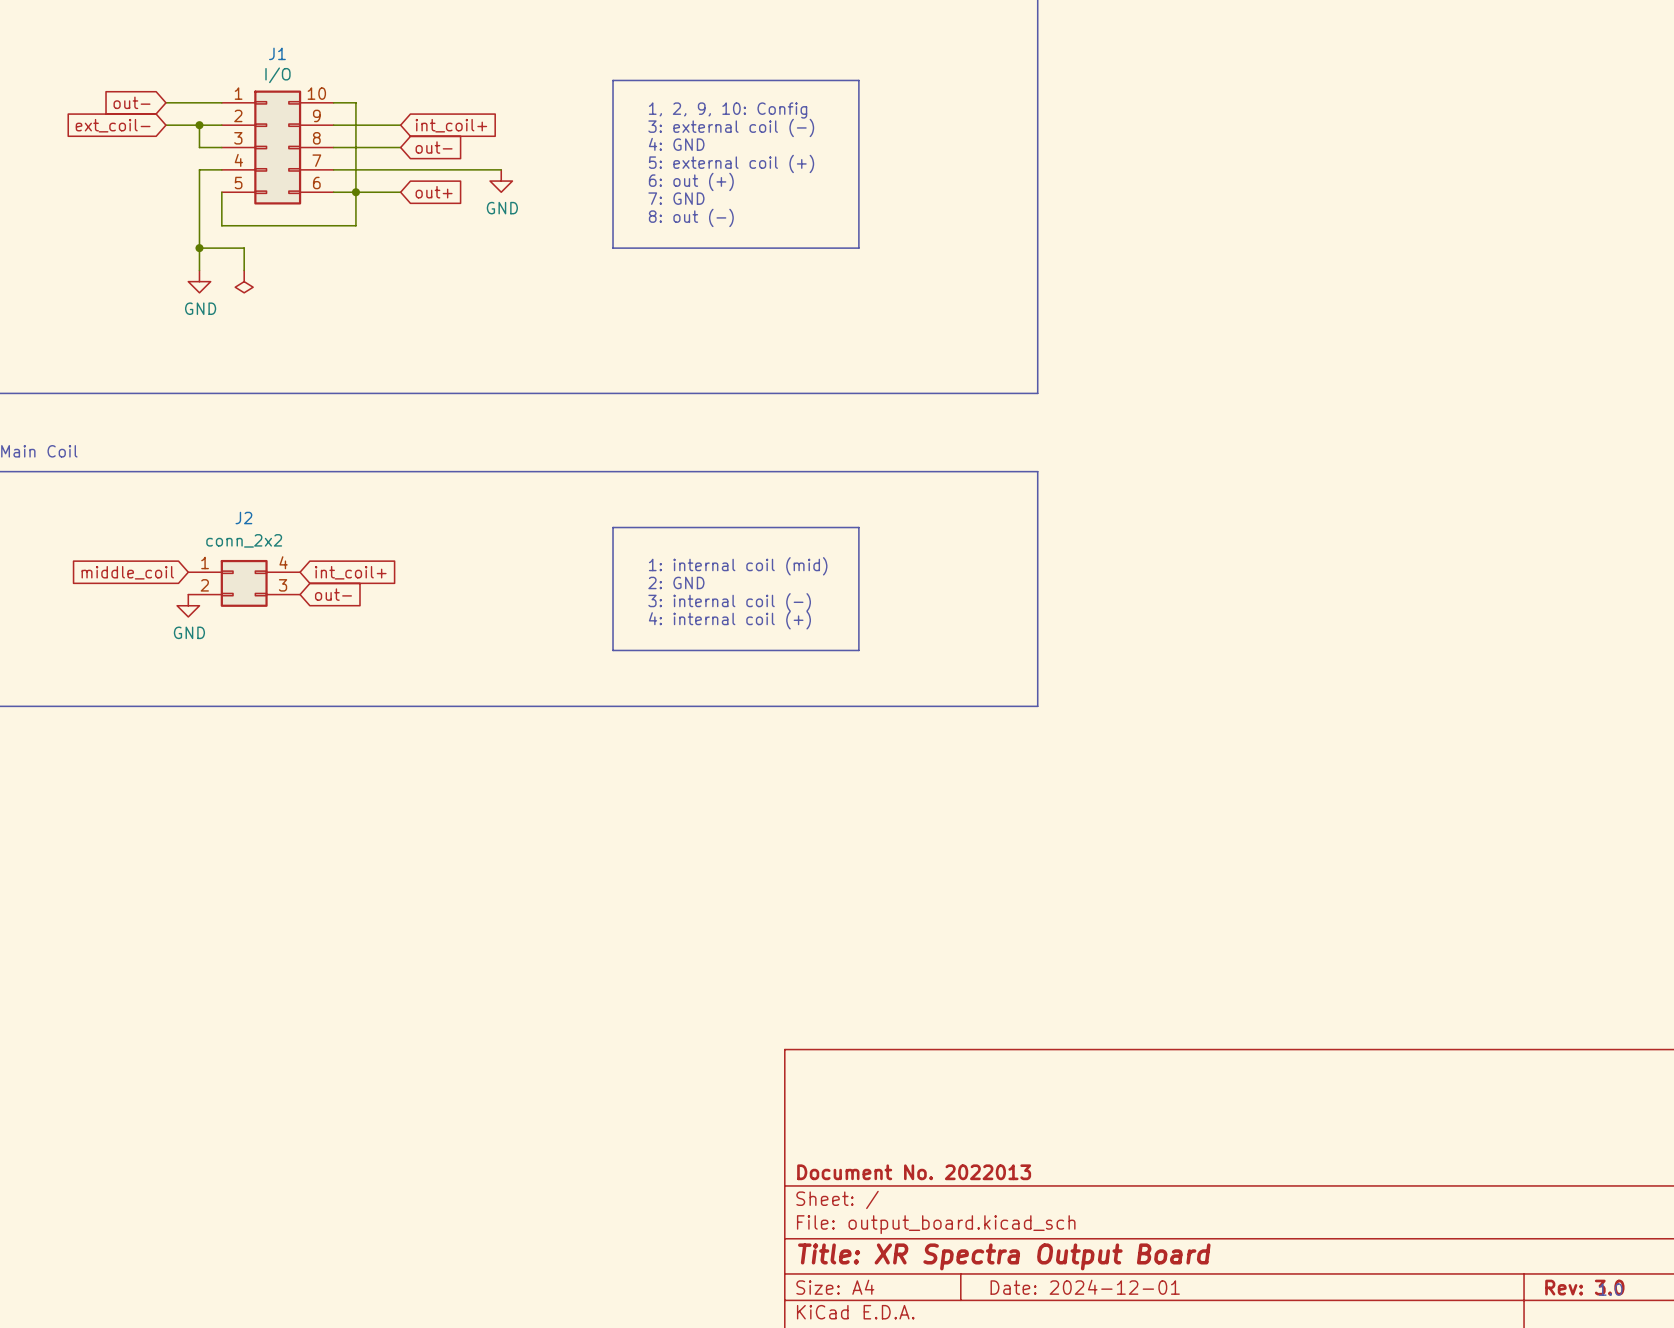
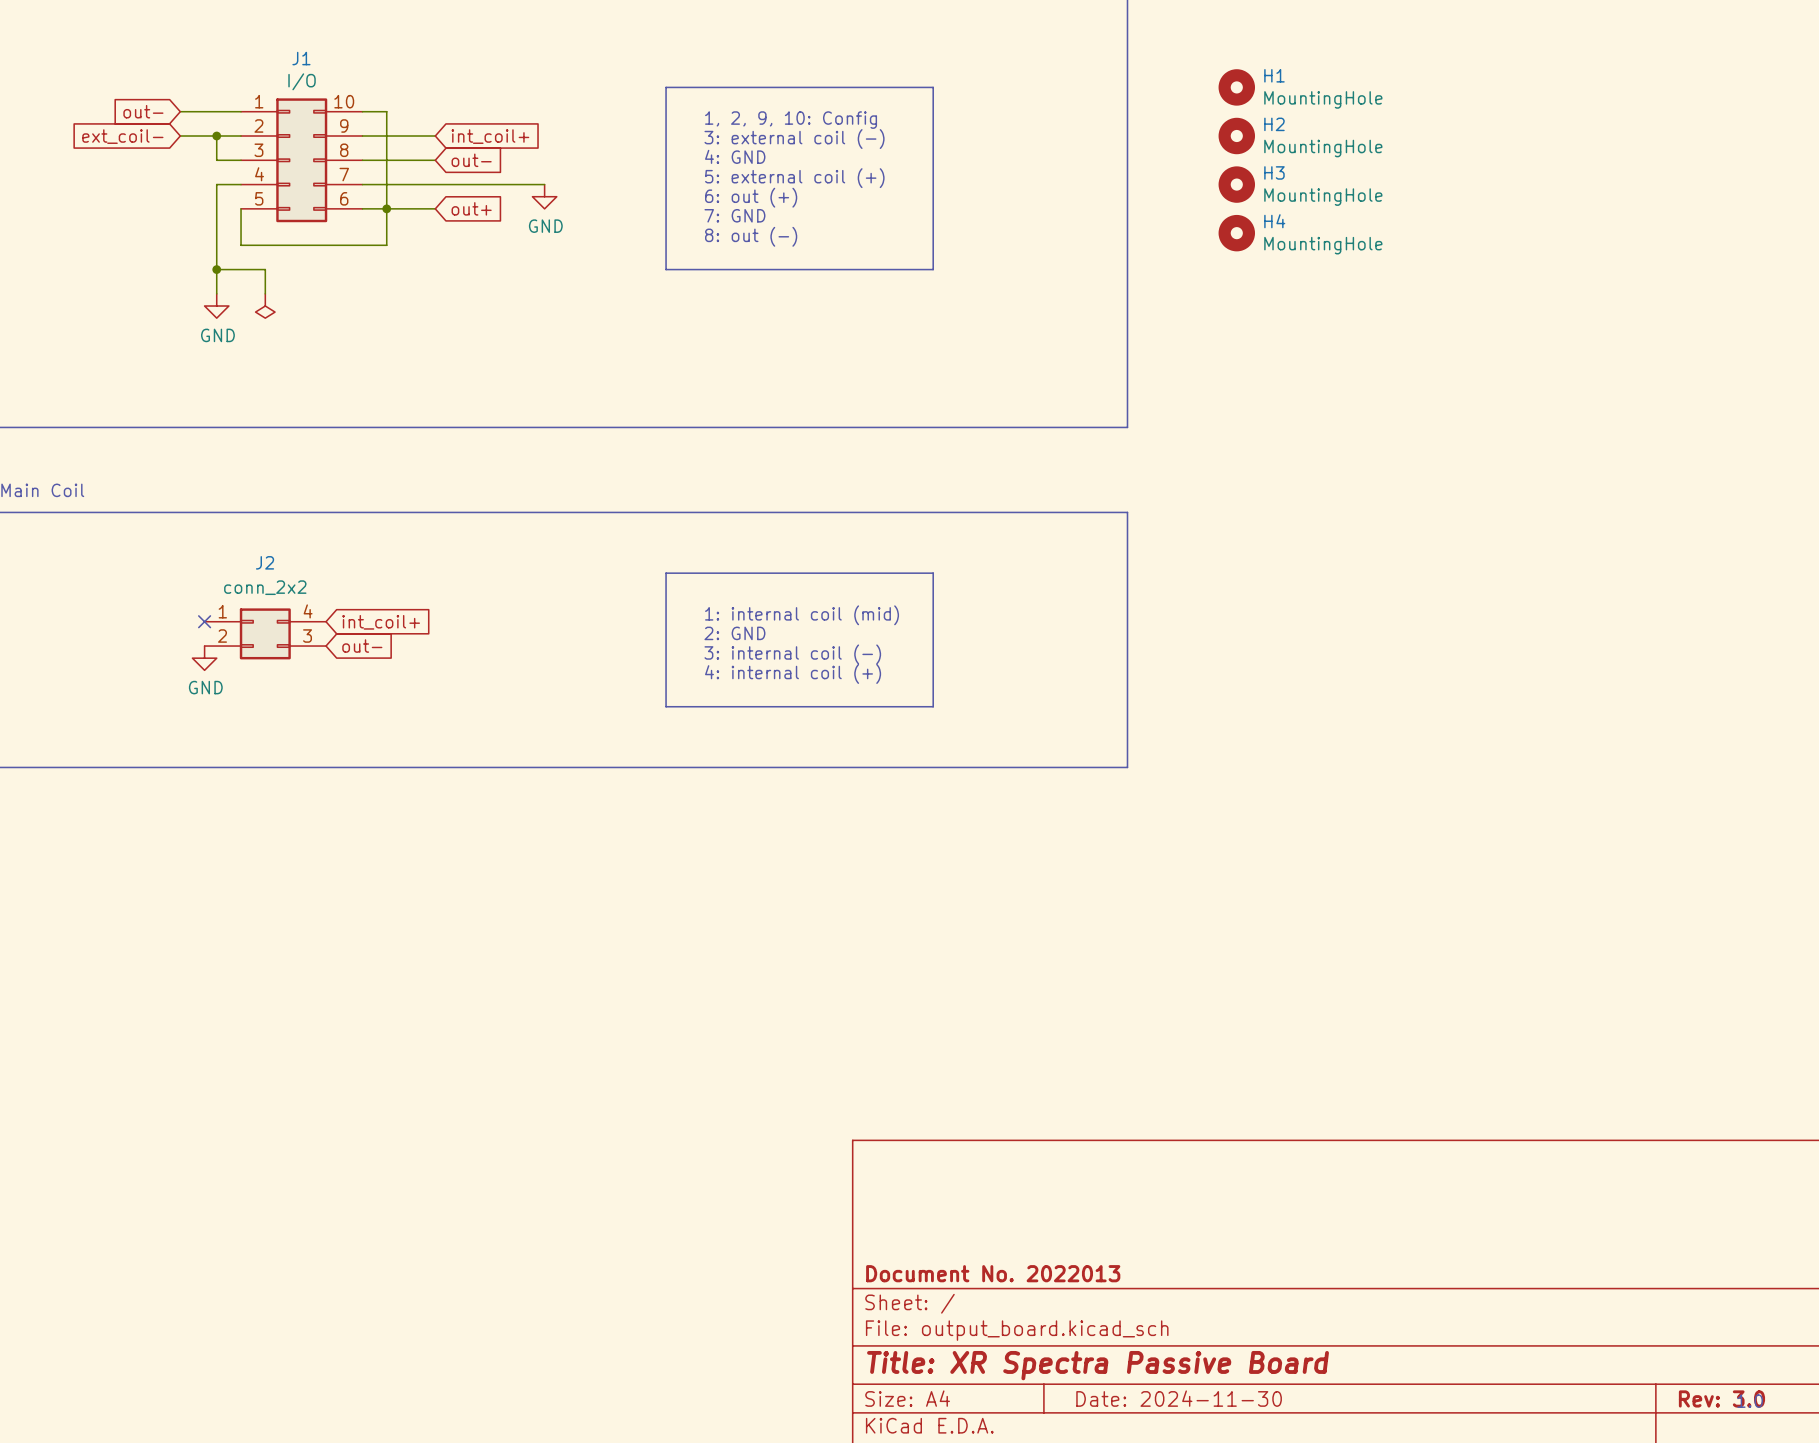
H1: none -> MountingHole (1236, 87)
H2: none -> MountingHole (1236, 136)
H3: none -> MountingHole (1236, 184)
H4: none -> MountingHole (1236, 233)
global label: middle_coil (127, 572) -> none
no-connect mark: none -> (204, 621)
title block: Title: XR Spectra Output Board (1004, 1256) -> Title: XR Spectra Passive Board (1098, 1365)
title block: Date: 2024-12-01 (1085, 1287) -> Date: 2024-11-30 (1179, 1398)

